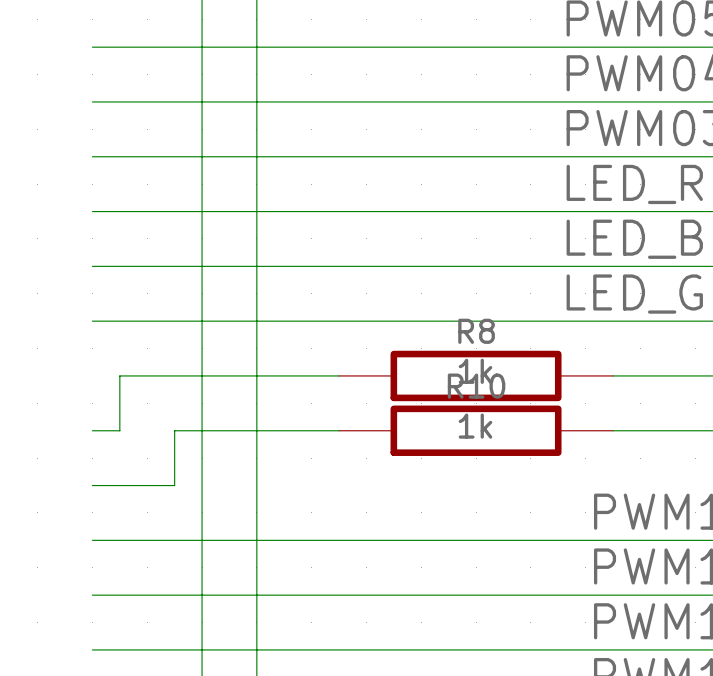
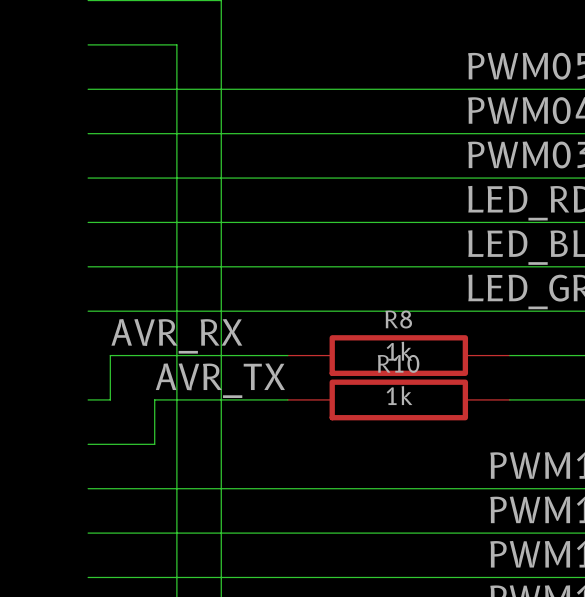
label: none -> AVR_RX (176, 336)
label: none -> AVR_TX (220, 380)

